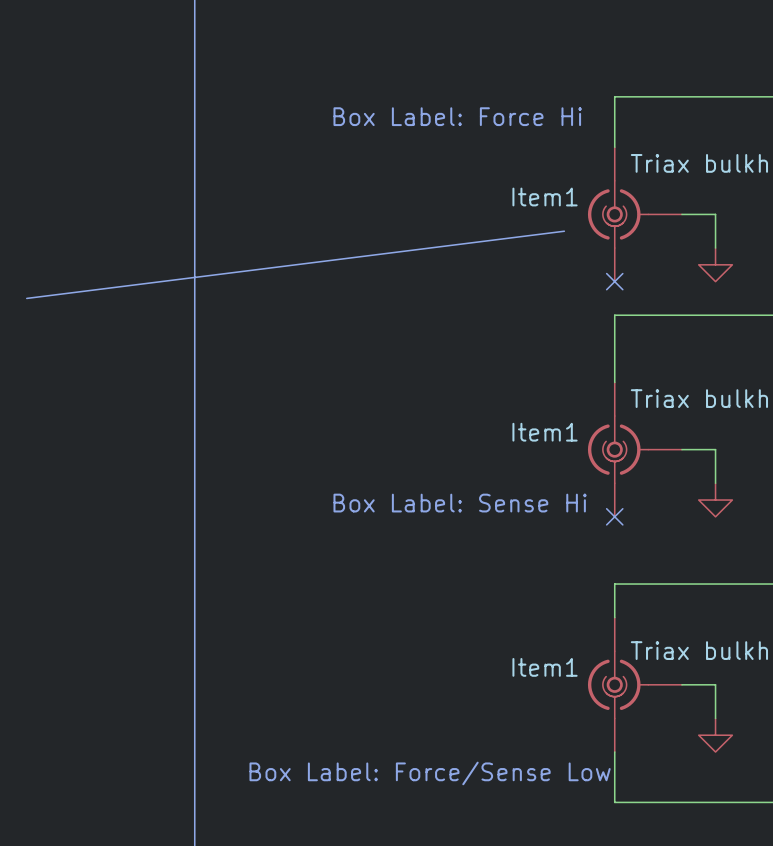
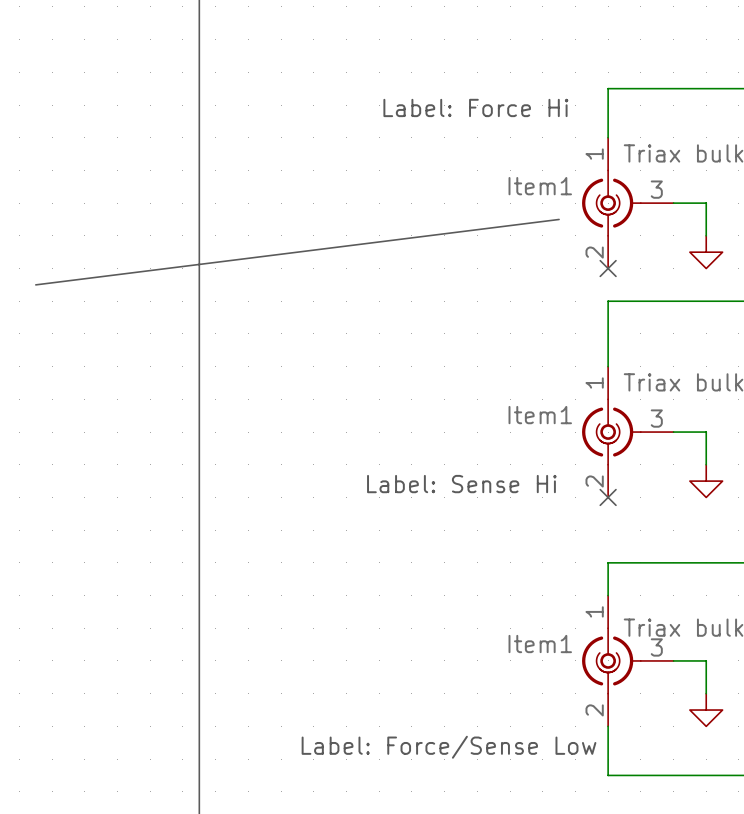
text: Box Label: Force Hi (457, 116) -> Label: Force Hi (475, 107)
Item1 pin number: none -> 1 (594, 154)
Item1 pin number: none -> 3 (656, 189)
Item1 pin number: none -> 2 (594, 252)
Item1 pin number: none -> 1 (594, 382)
Item1 pin number: none -> 3 (656, 418)
Item1 pin number: none -> 2 (594, 481)
text: Box Label: Sense Hi (460, 503) -> Label: Sense Hi (461, 484)
Item1 pin number: none -> 1 (594, 611)
Item1 pin number: none -> 3 (656, 647)
Item1 pin number: none -> 2 (594, 710)
text: Box Label: Force/Sense Low (430, 773) -> Label: Force/Sense Low (449, 747)

